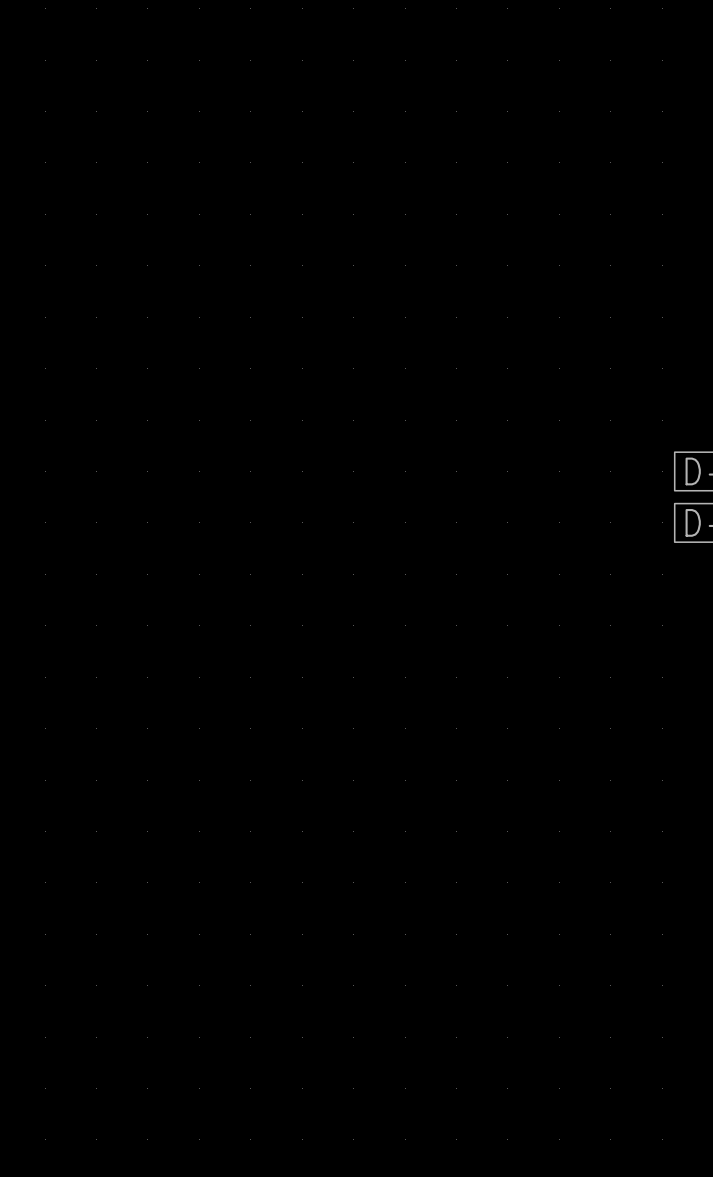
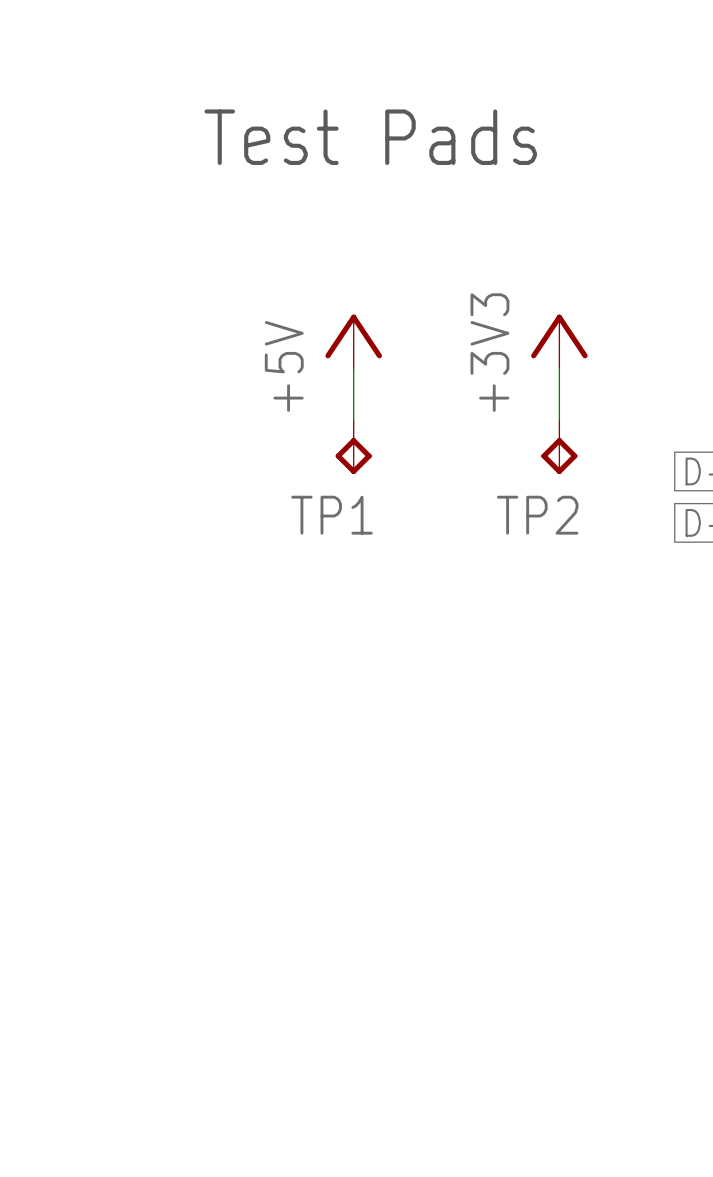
text: none -> Test Pads (370, 137)
power symbol: none -> +5V (353, 341)
power symbol: none -> +3V3 (559, 341)
wire: none -> (353, 368) (353, 420)
wire: none -> (559, 368) (559, 420)
TP1: none -> (353, 447)
TP2: none -> (559, 447)

